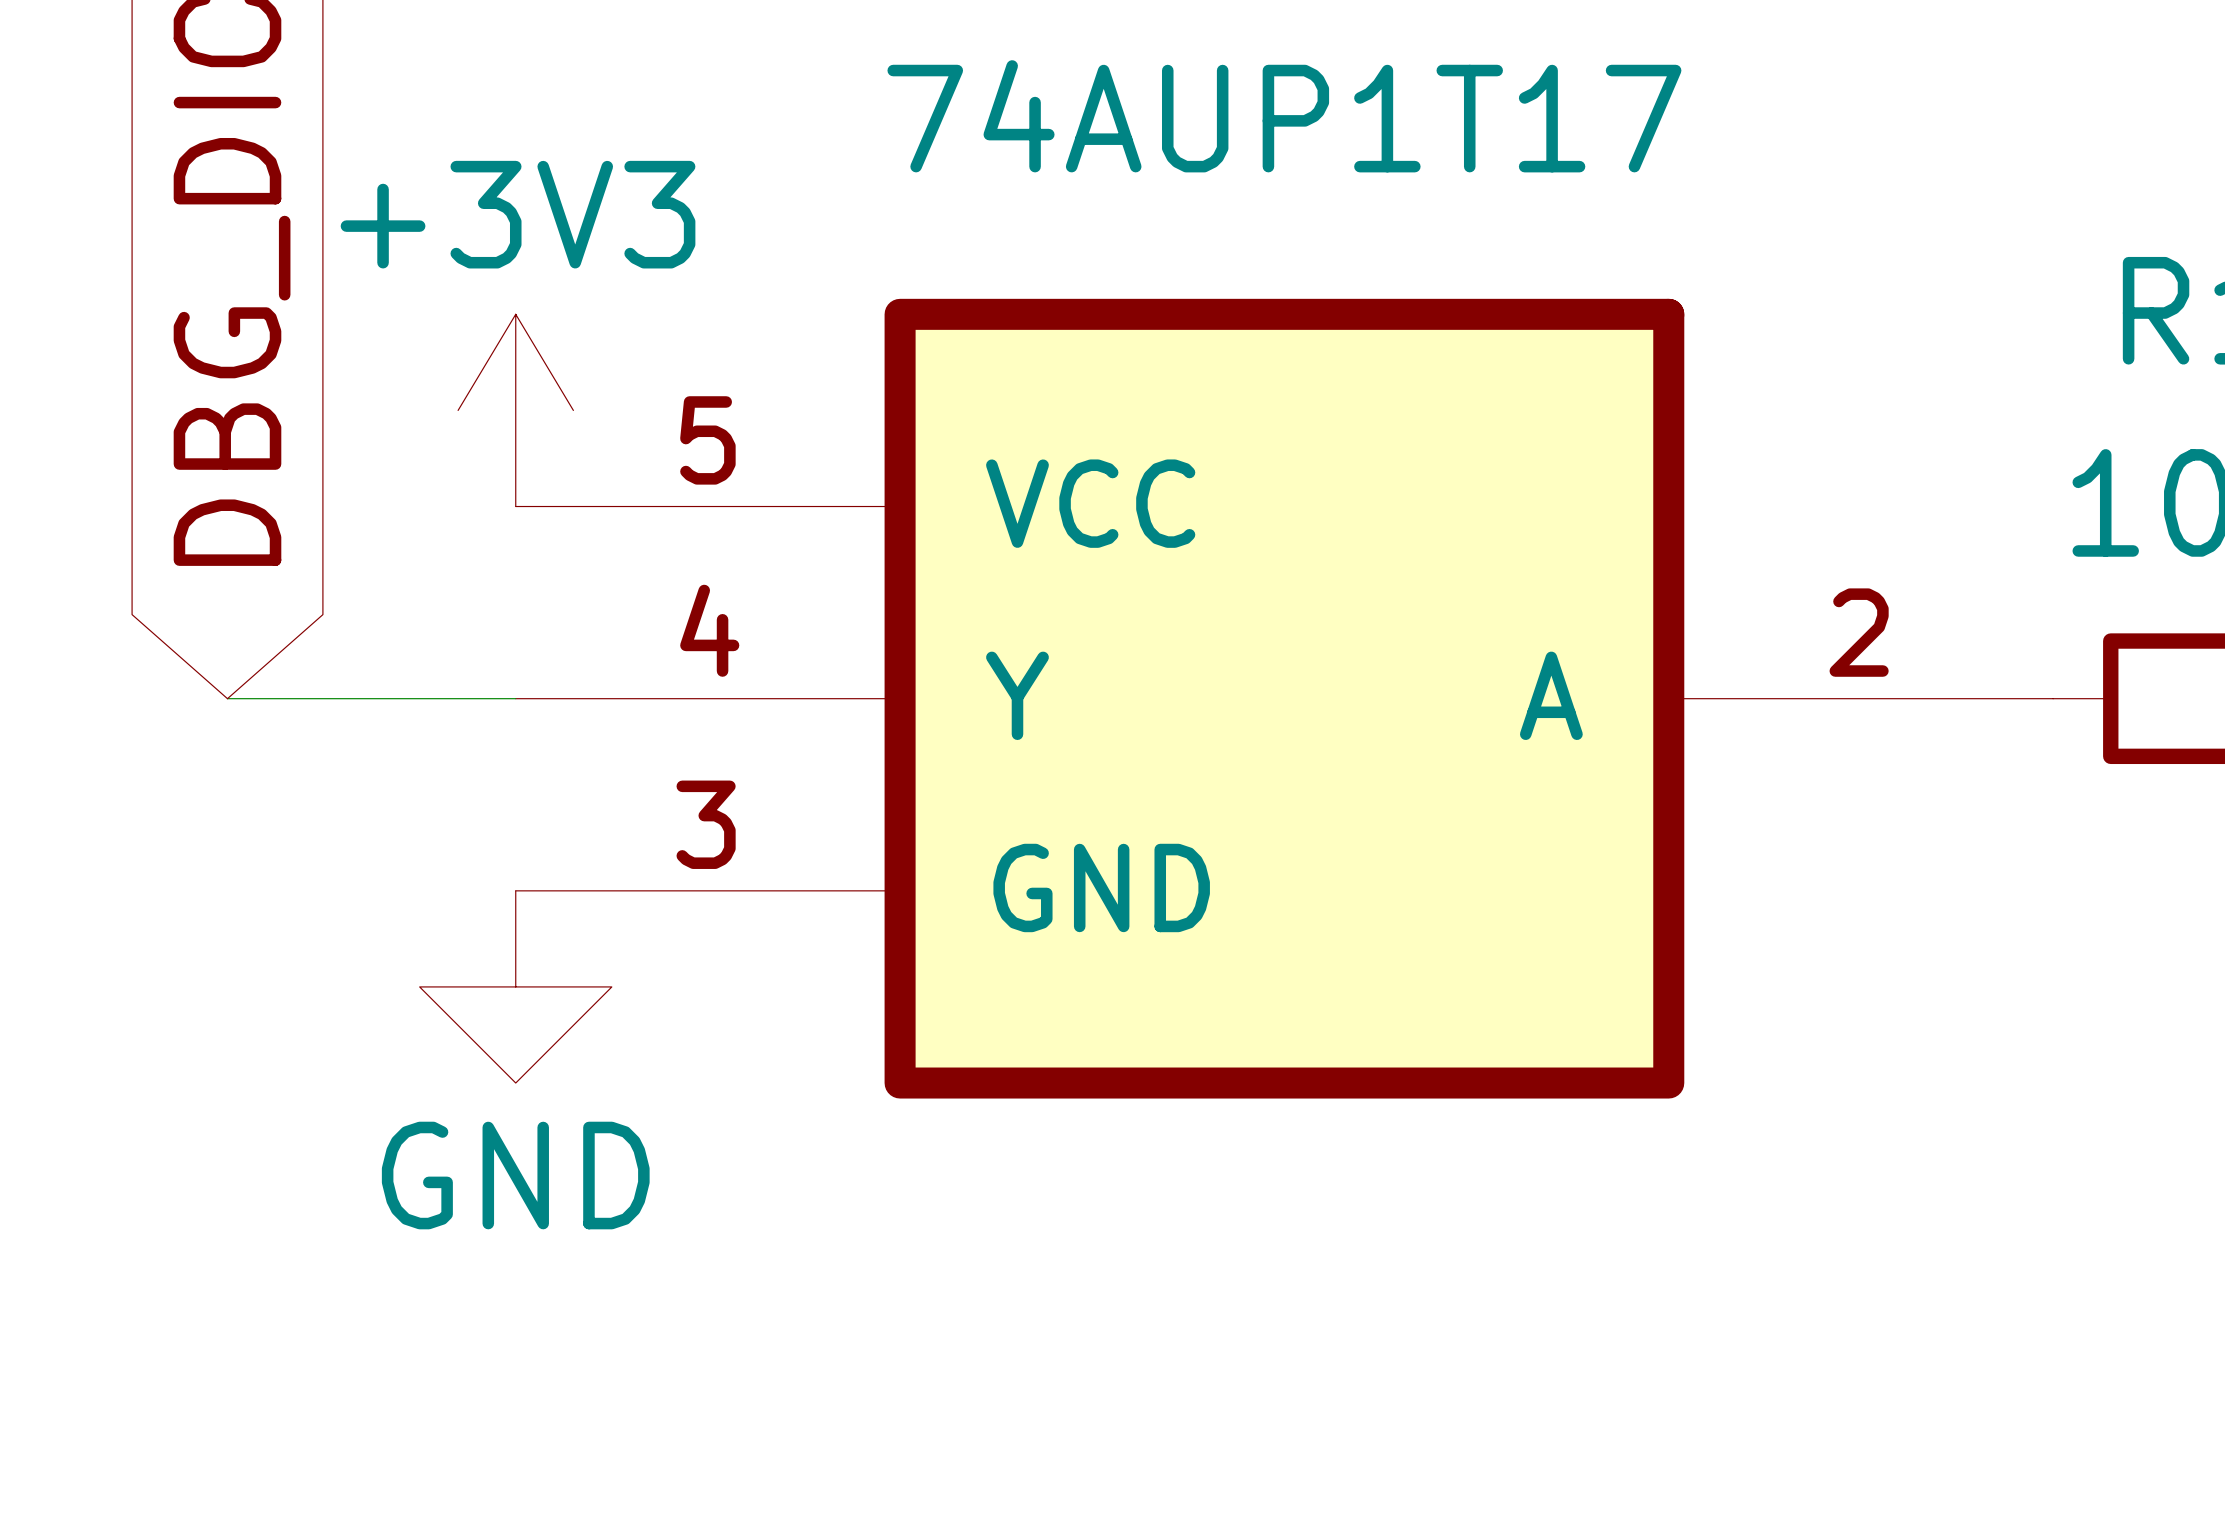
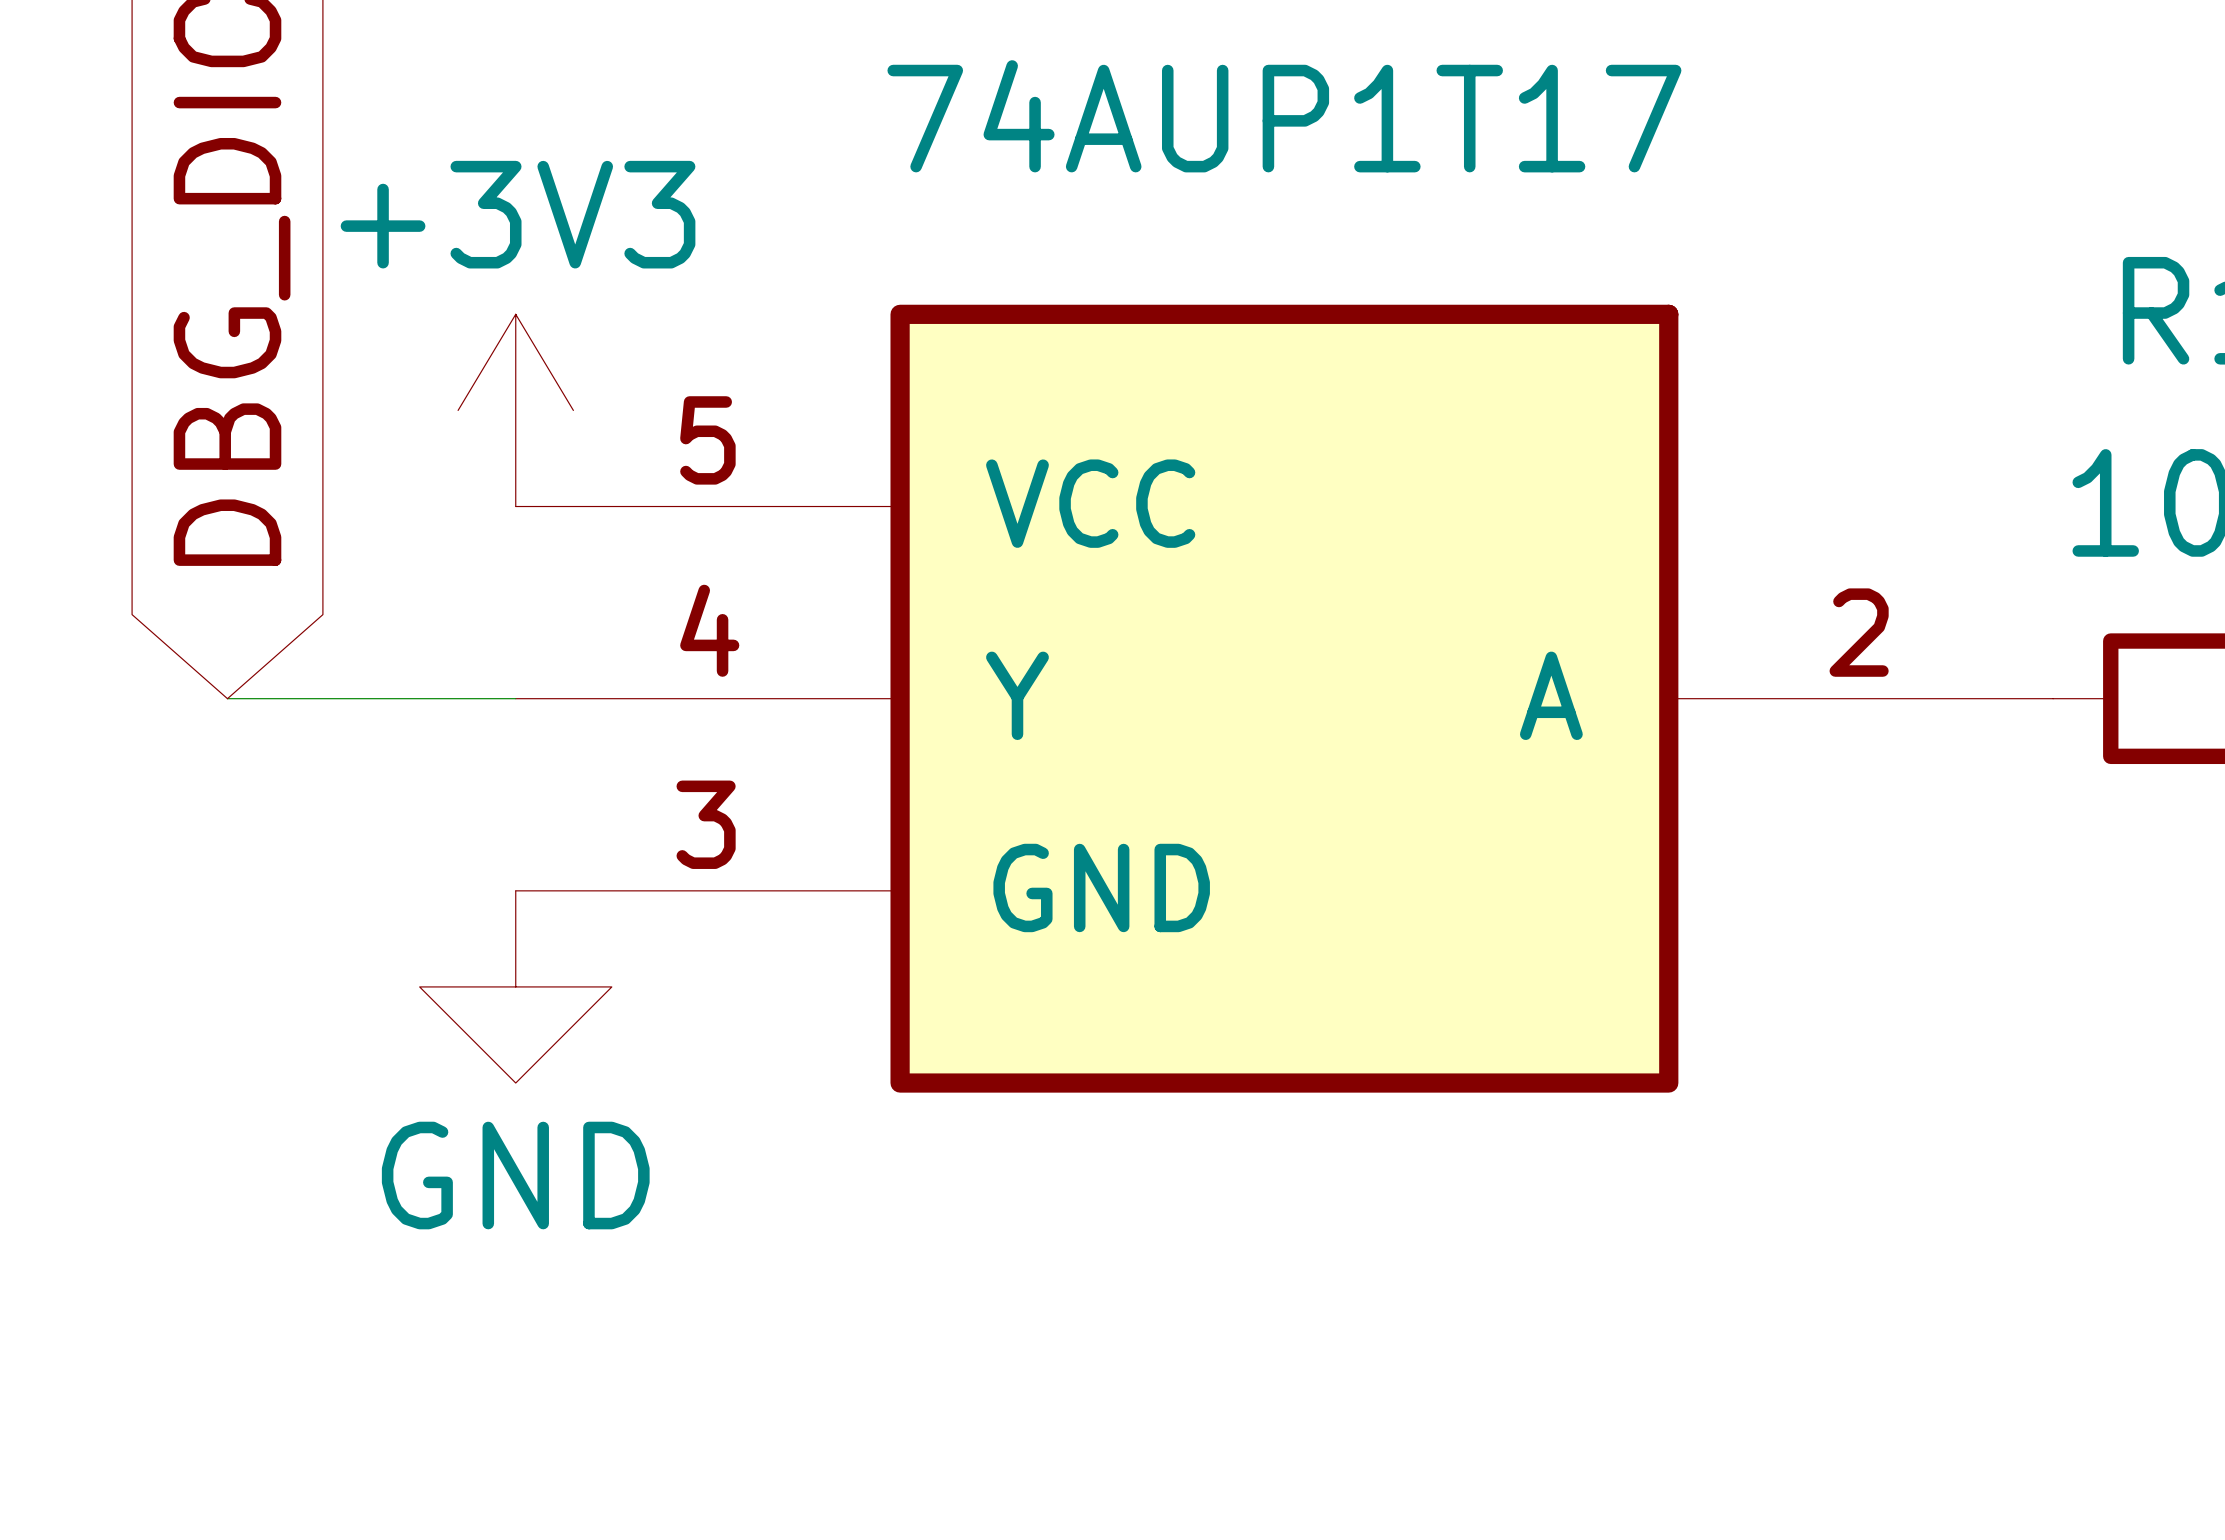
part symbol: [515, 298, 2054, 1099] -> [515, 304, 2054, 1093]

